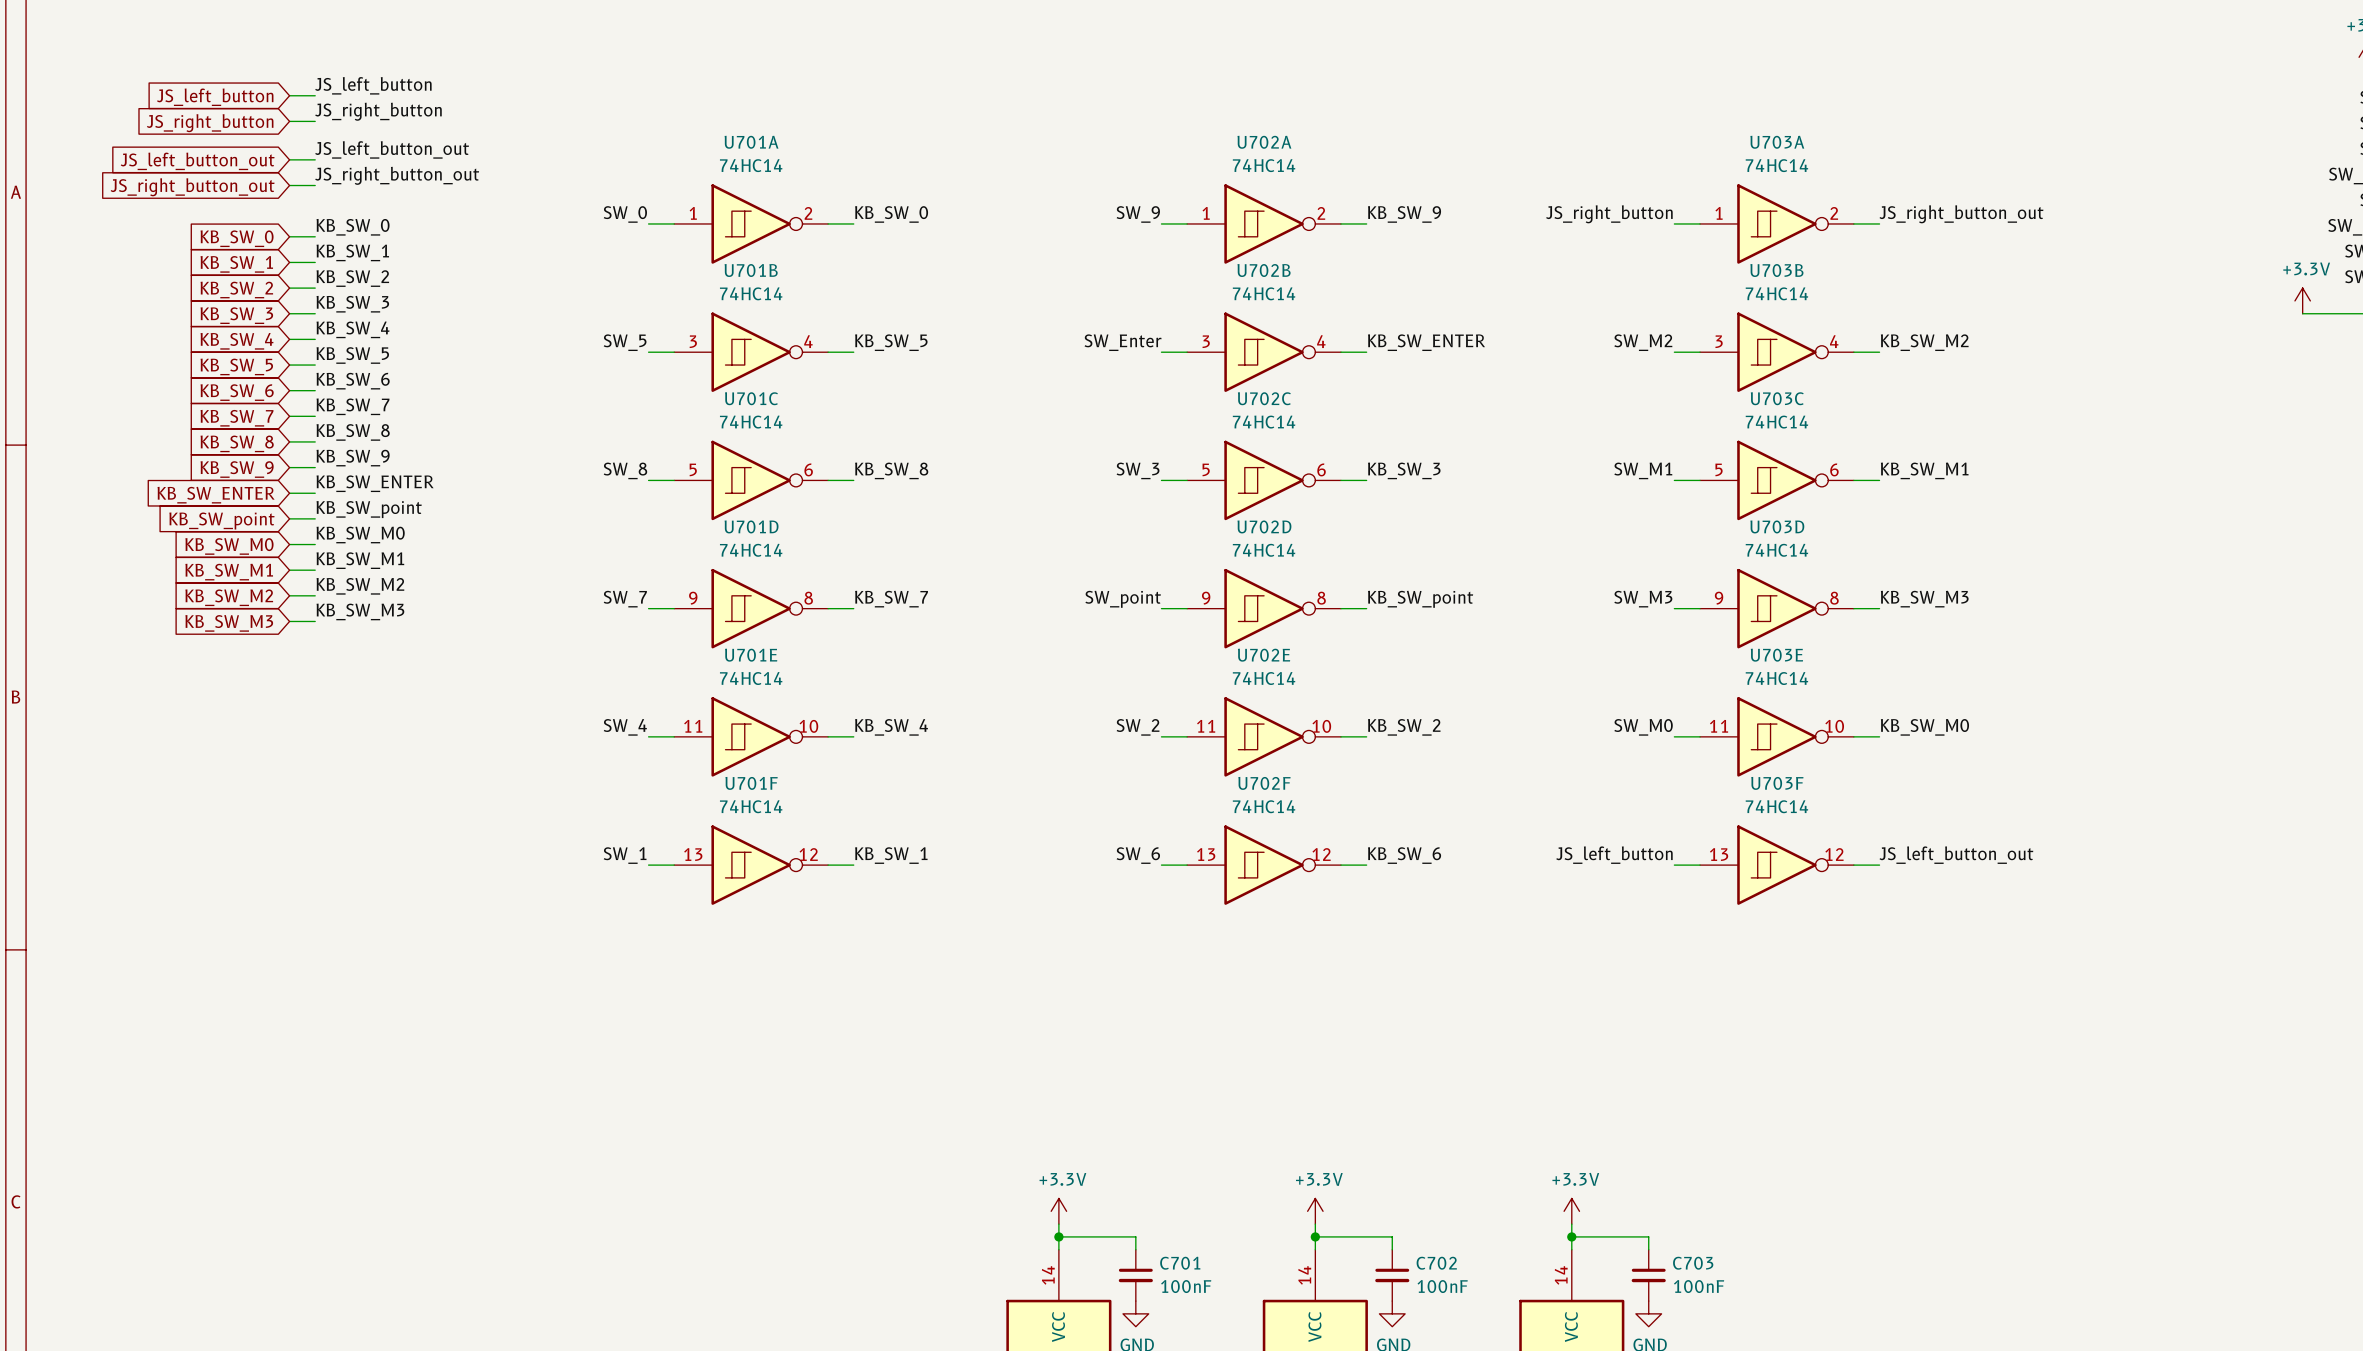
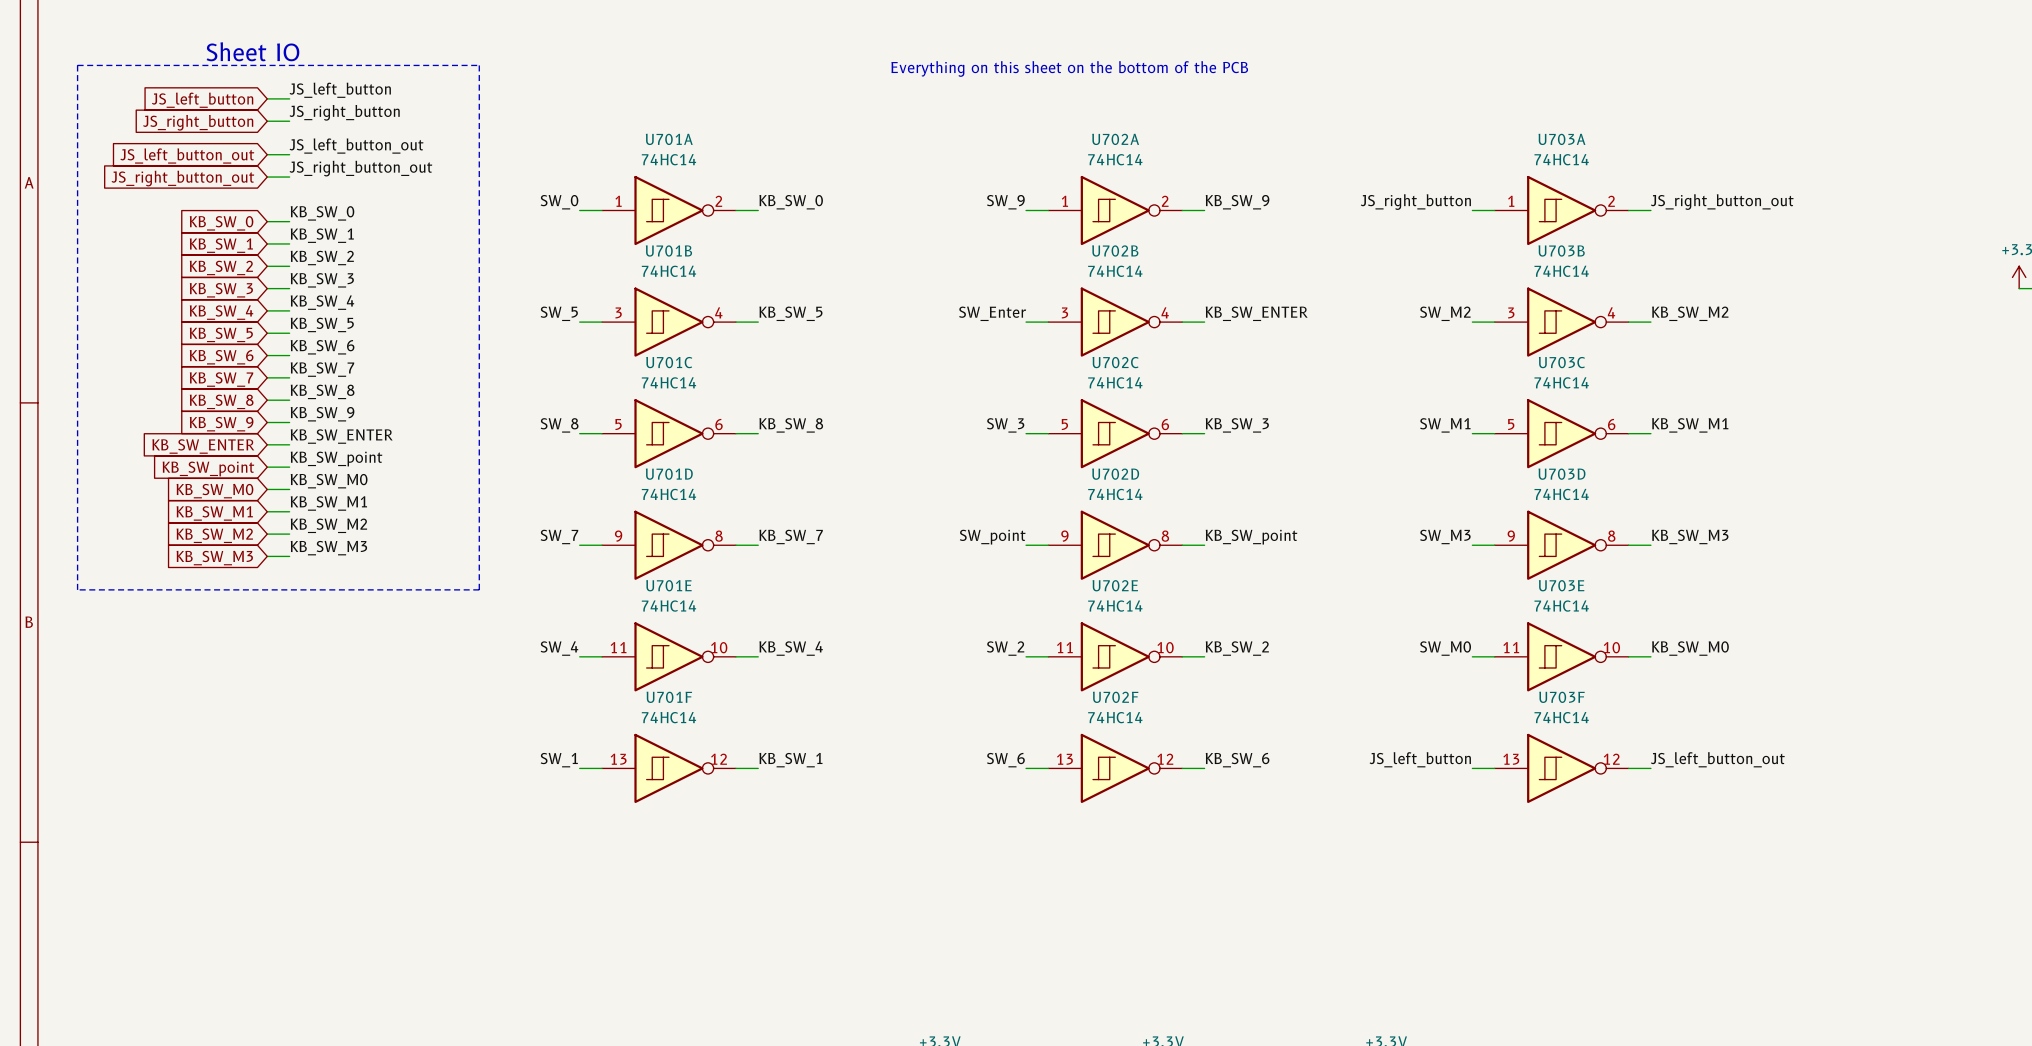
text: none -> Sheet IO (252, 51)
line: none -> (77, 65) (77, 589) (479, 589) (479, 65) (77, 65)
text: none -> Everything on this sheet on the bottom of the PCB (1069, 68)

